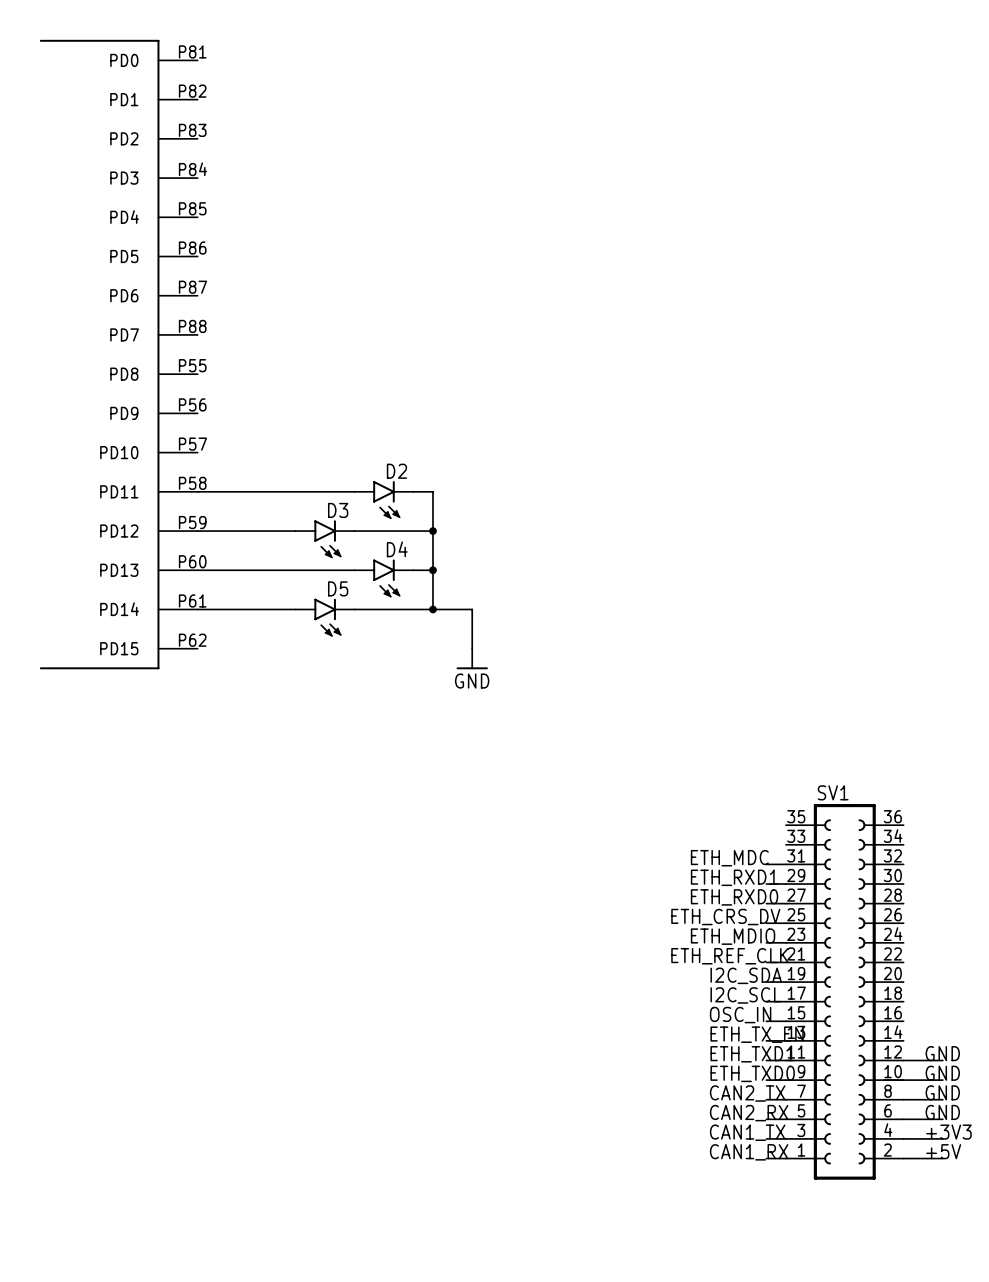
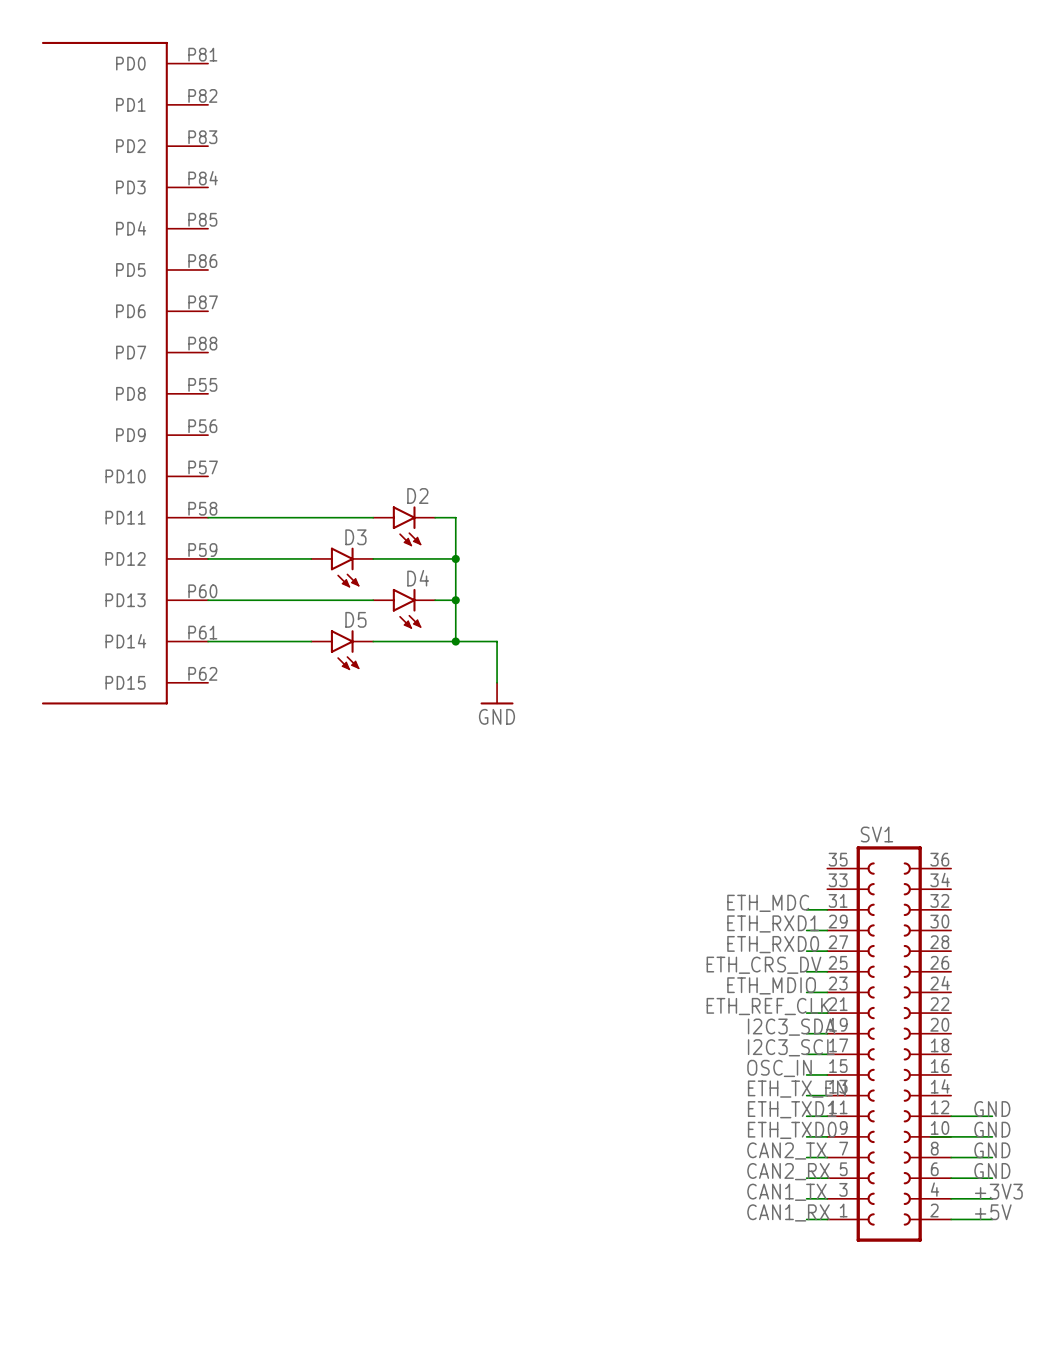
label: I2C_SDA (746, 975) -> I2C3_SDA (791, 1027)
label: I2C_SCL (745, 995) -> I2C3_SCL (791, 1047)

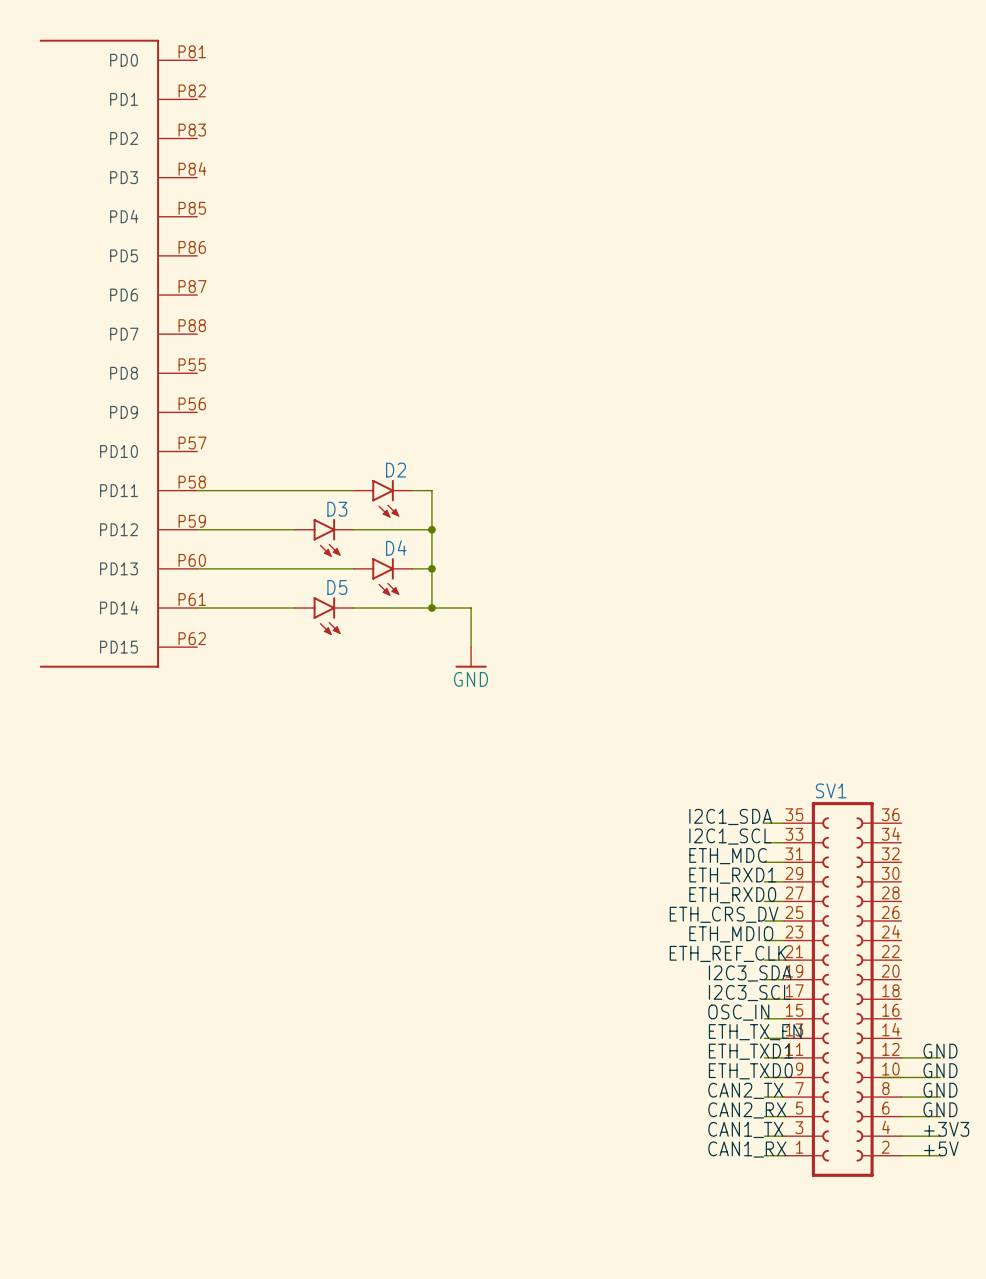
label: none -> I2C1_SDA (730, 816)
wire: none -> (764, 823) (784, 823)
label: none -> I2C1_SCL (730, 836)
wire: none -> (764, 842) (784, 842)

